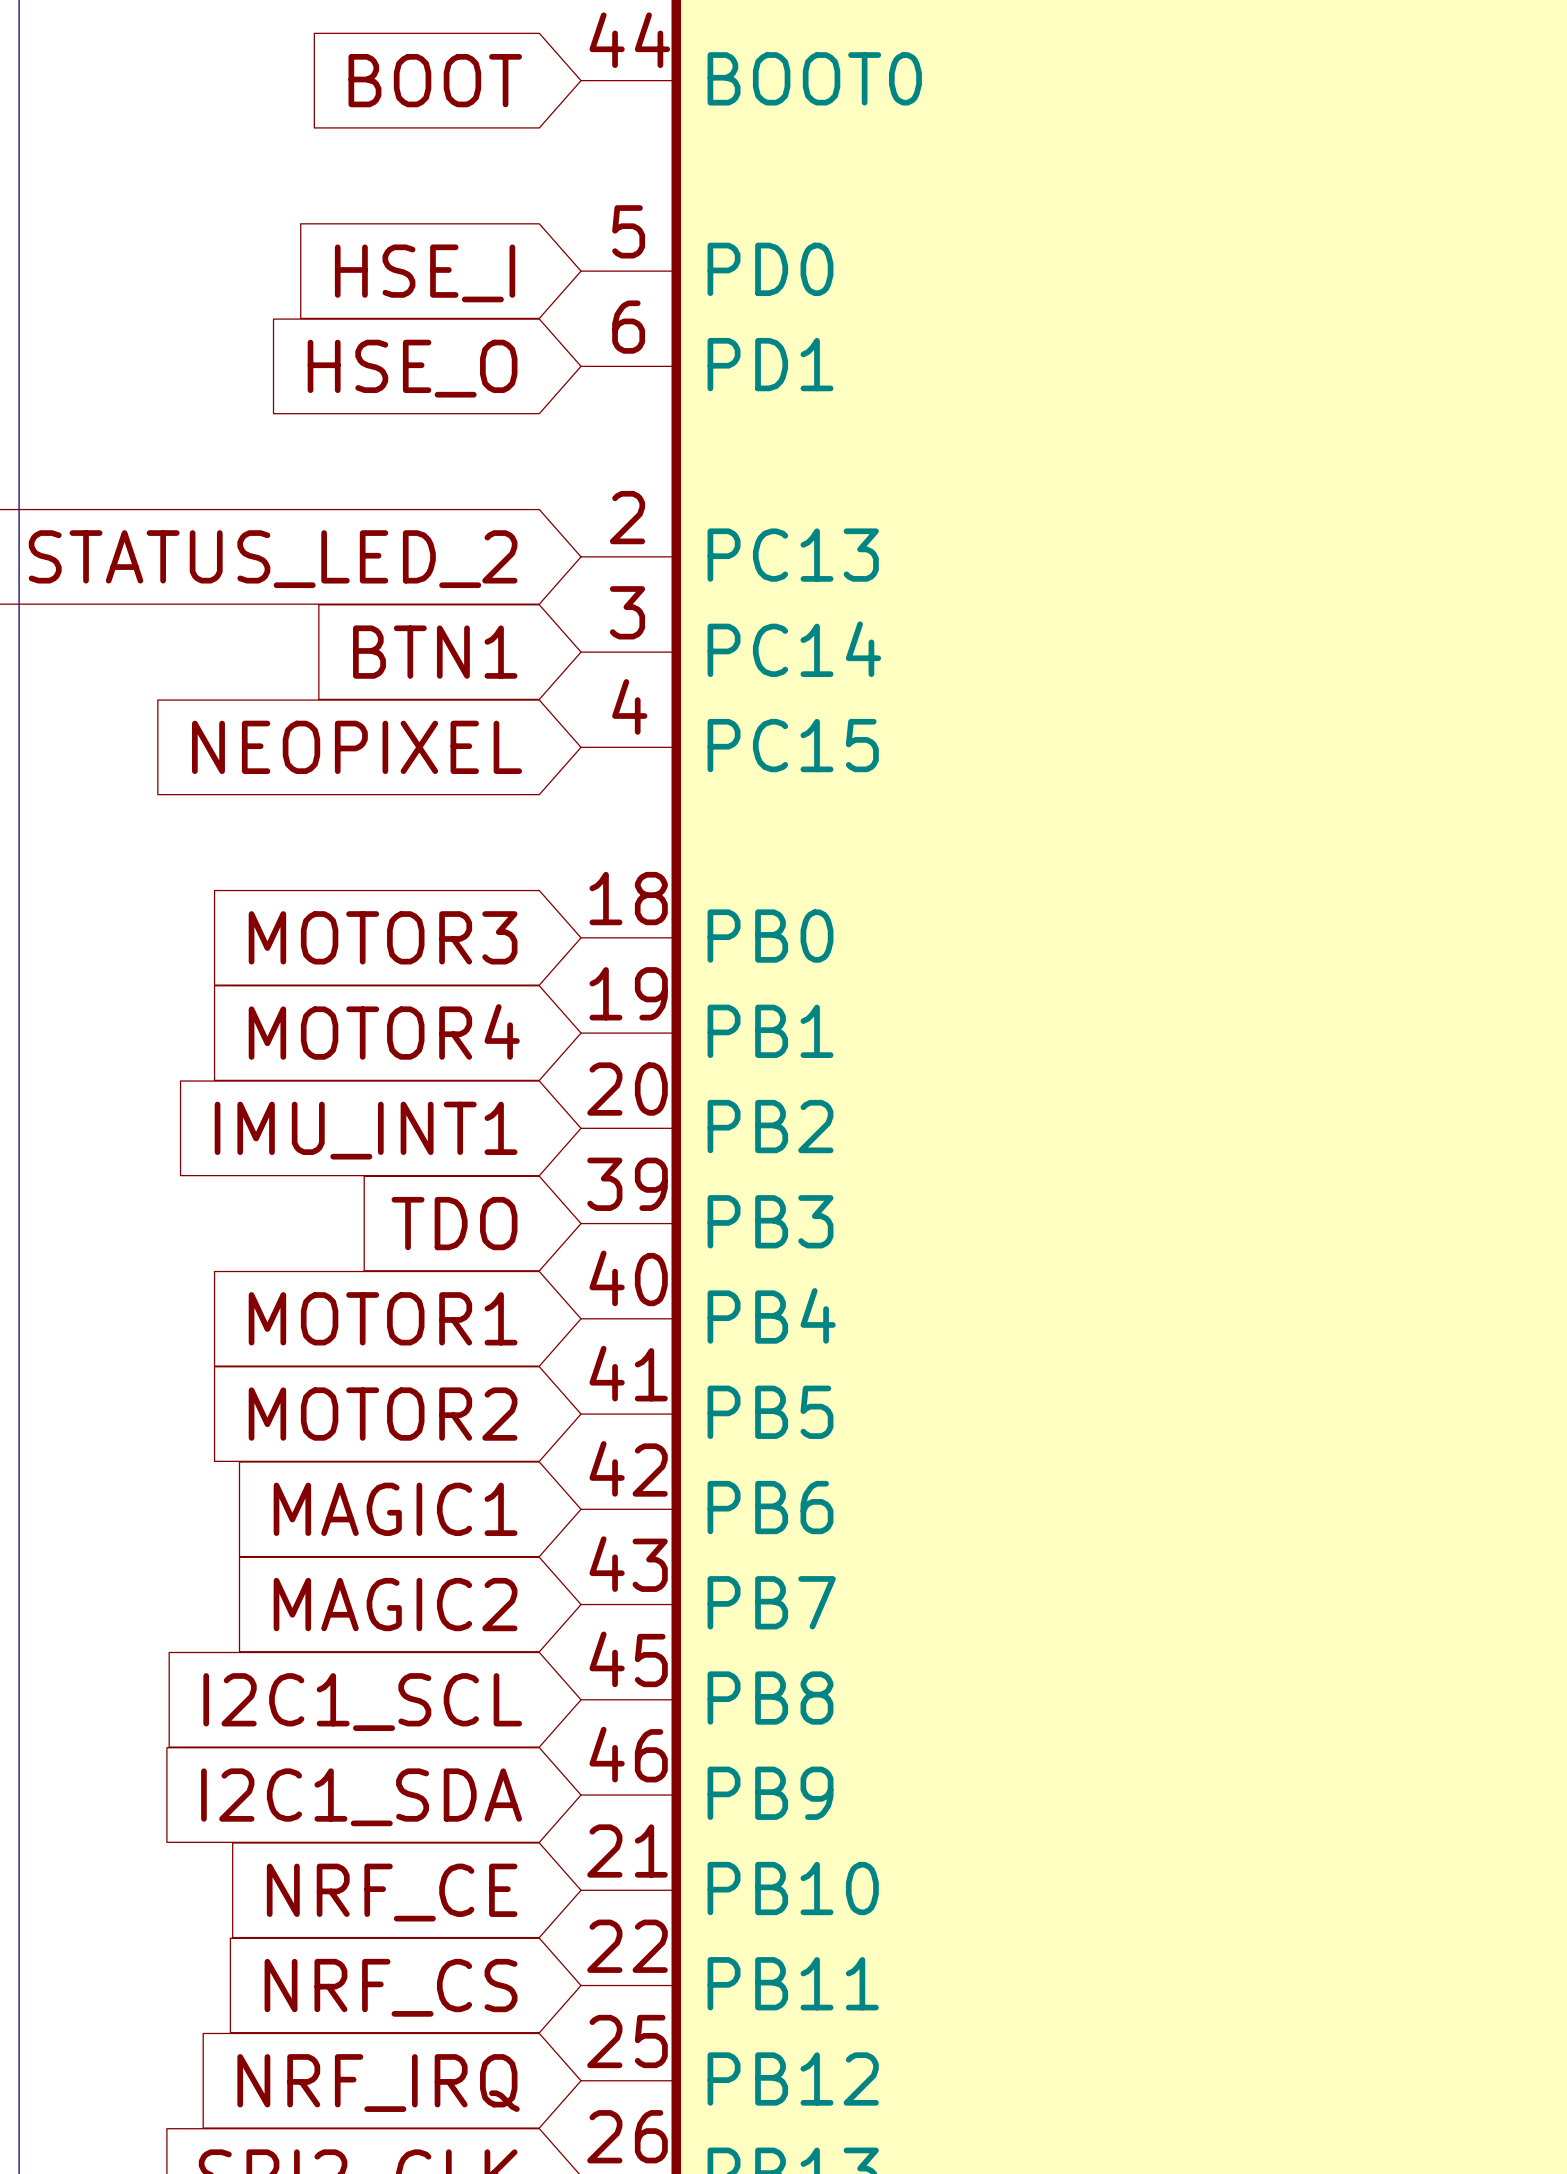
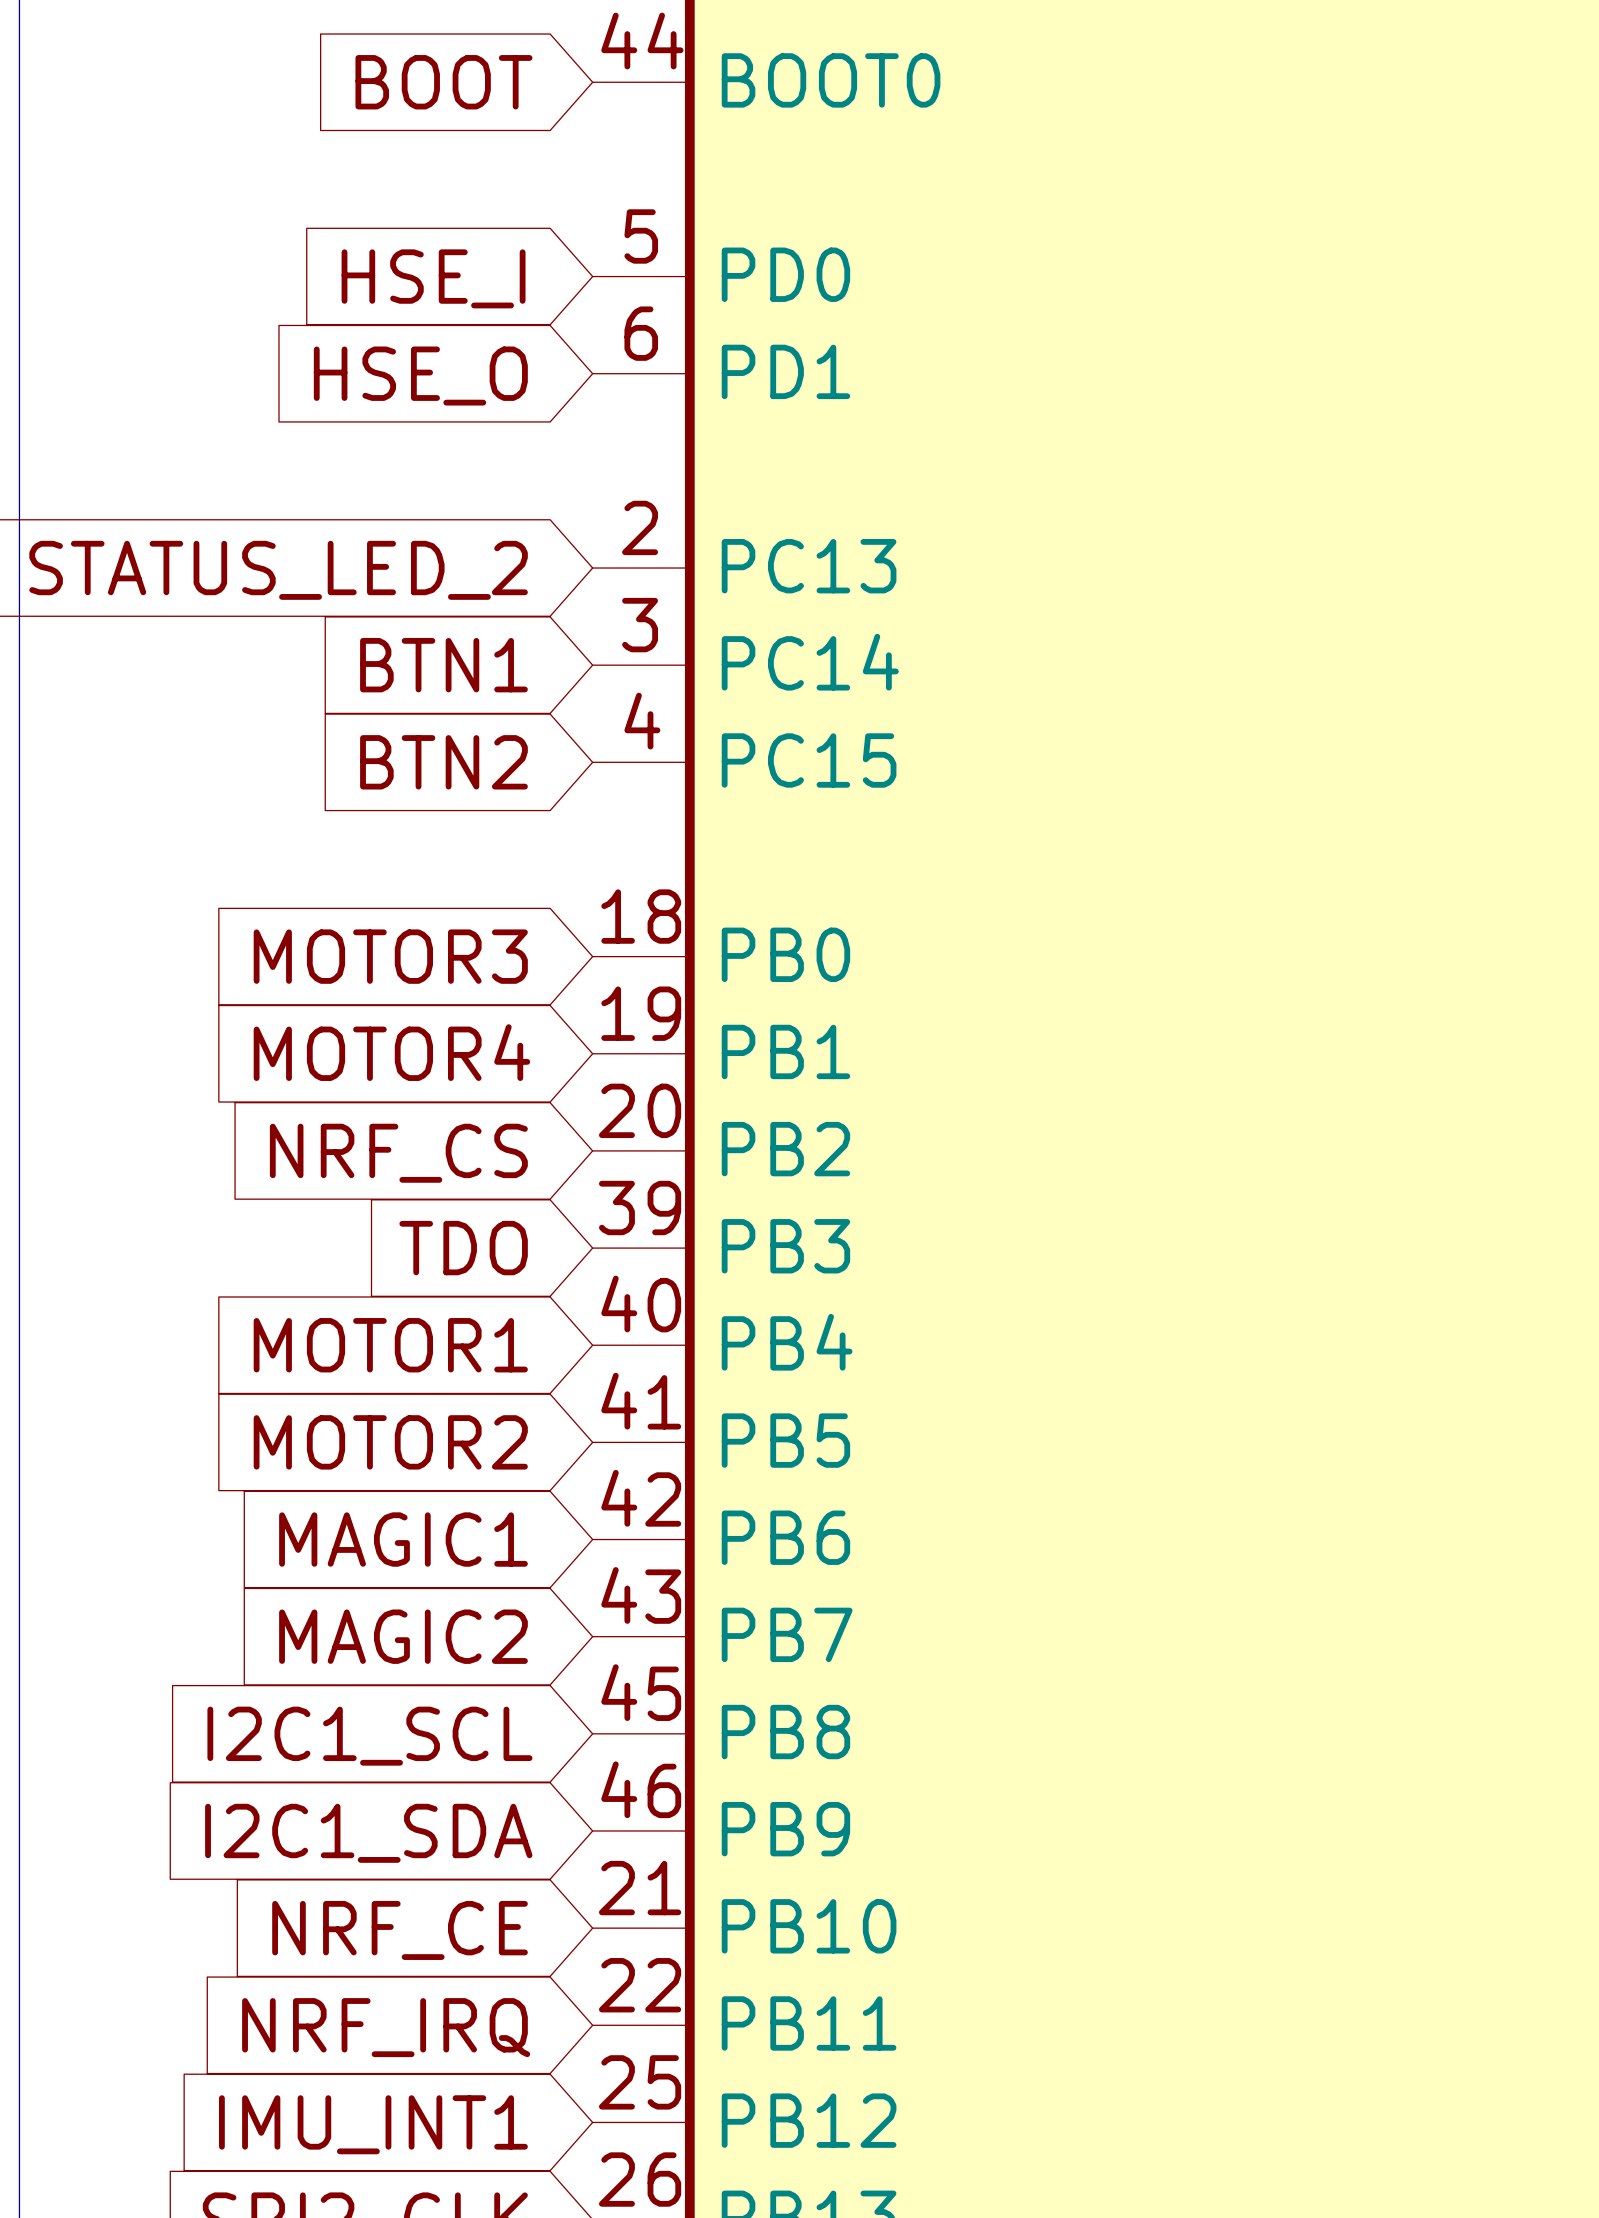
global label: NEOPIXEL (357, 747) -> BTN2 (443, 762)
global label: IMU_INT1 (366, 1130) -> NRF_CS (398, 1153)
global label: NRF_CS (391, 1987) -> NRF_IRQ (386, 2027)
global label: NRF_IRQ (378, 2083) -> IMU_INT1 (373, 2124)

